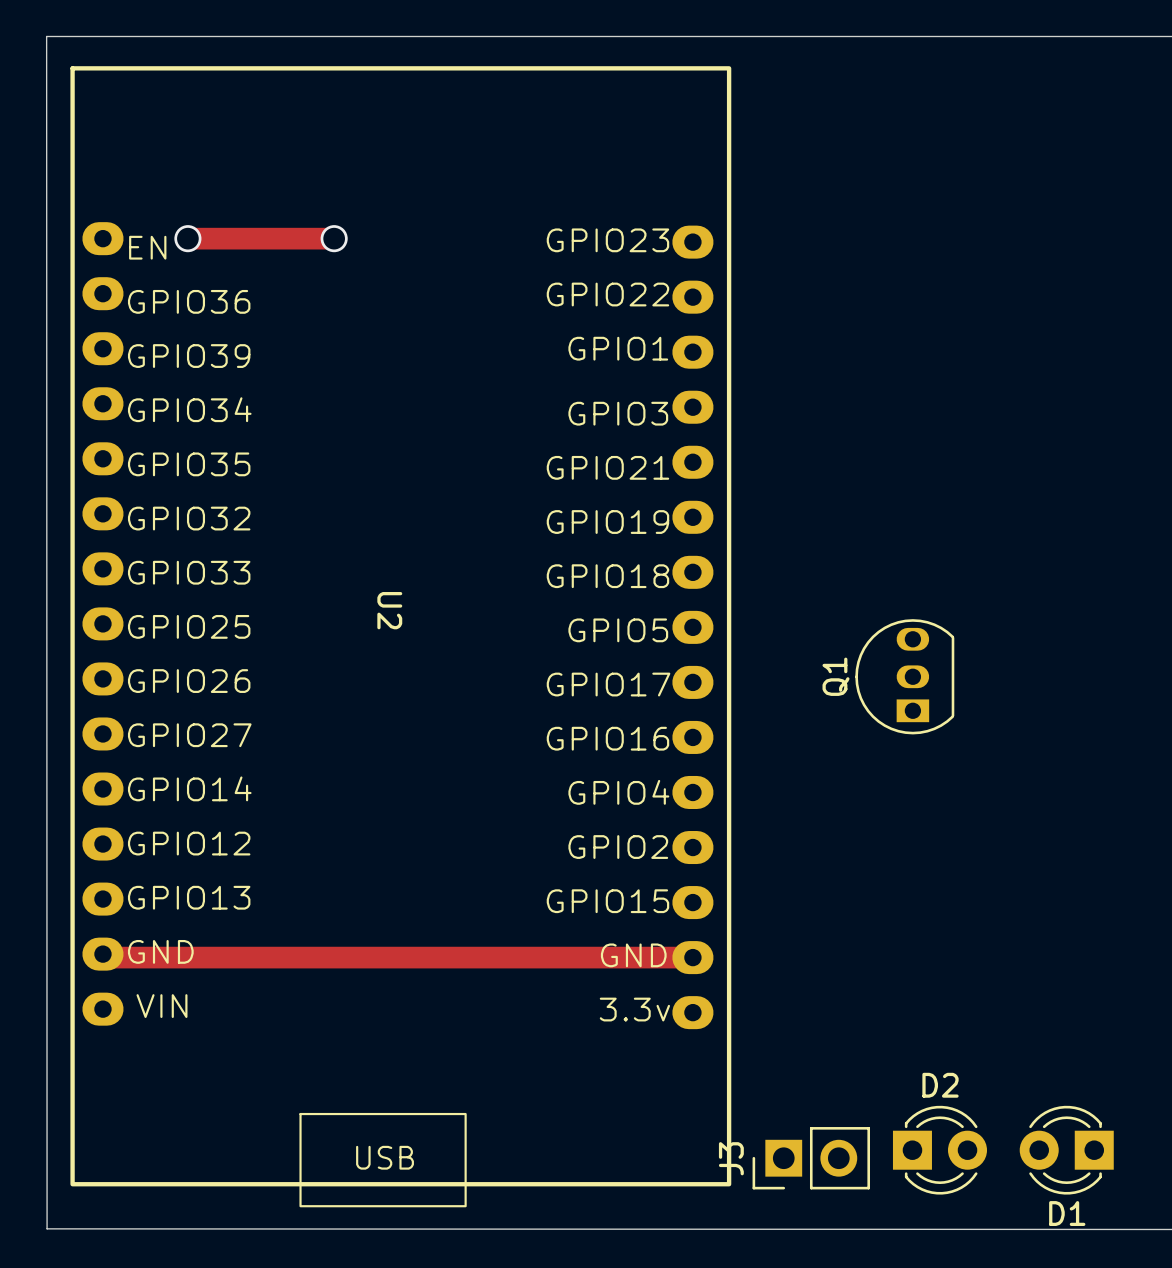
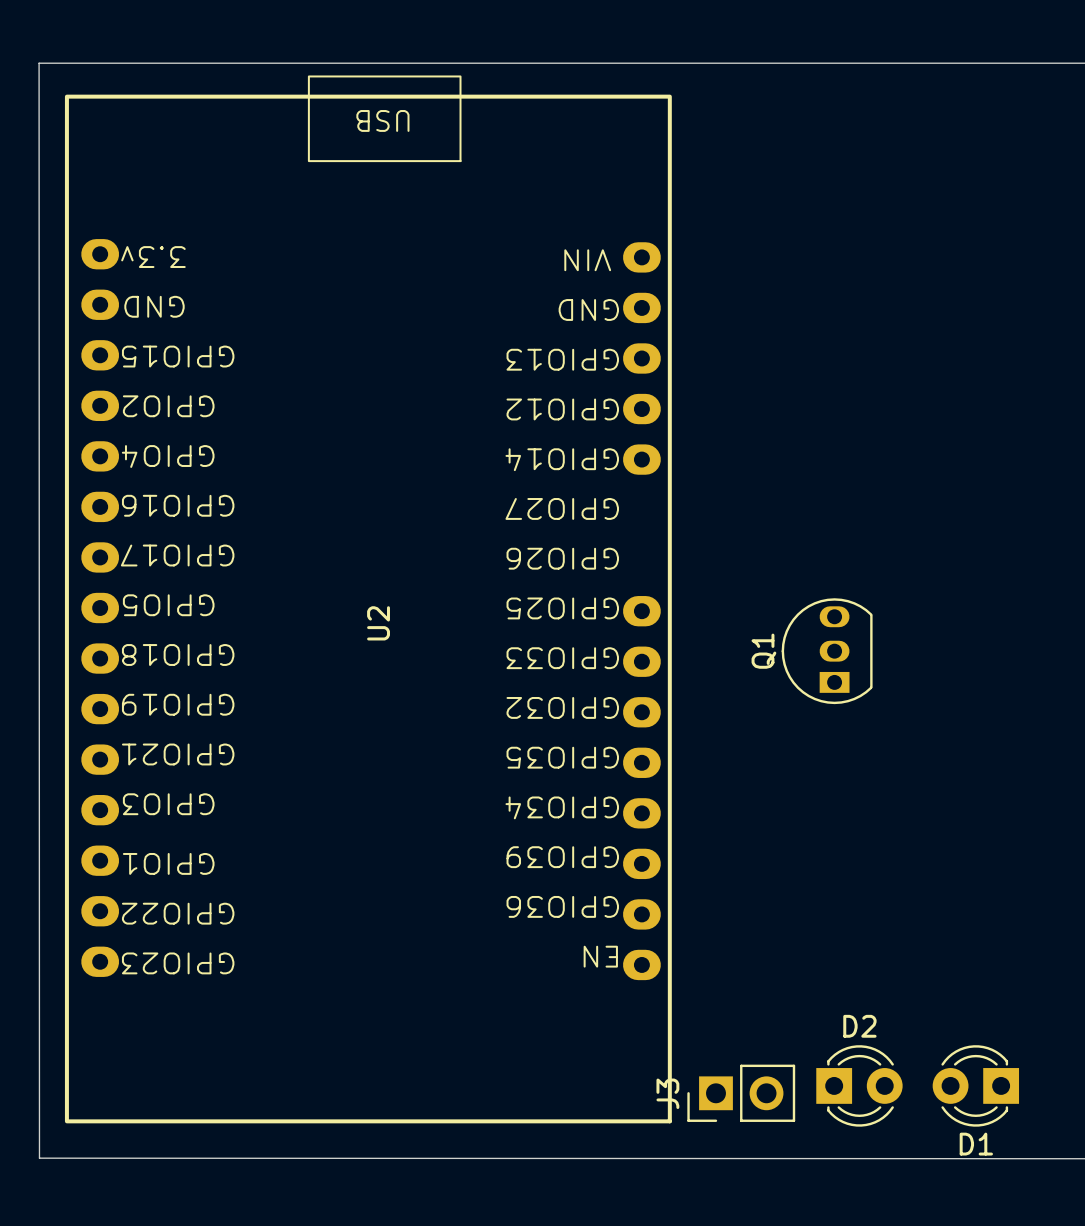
U2 footprint: [70, 66, 732, 1208] -> [64, 75, 672, 1124]
track: (187, 238) (334, 238) -> none
via: (187, 238) -> none
via: (334, 238) -> none
U2 name position: U2 (389, 610) -> U2 (378, 623)
track: (102, 954) (106, 957) (692, 957) -> none

